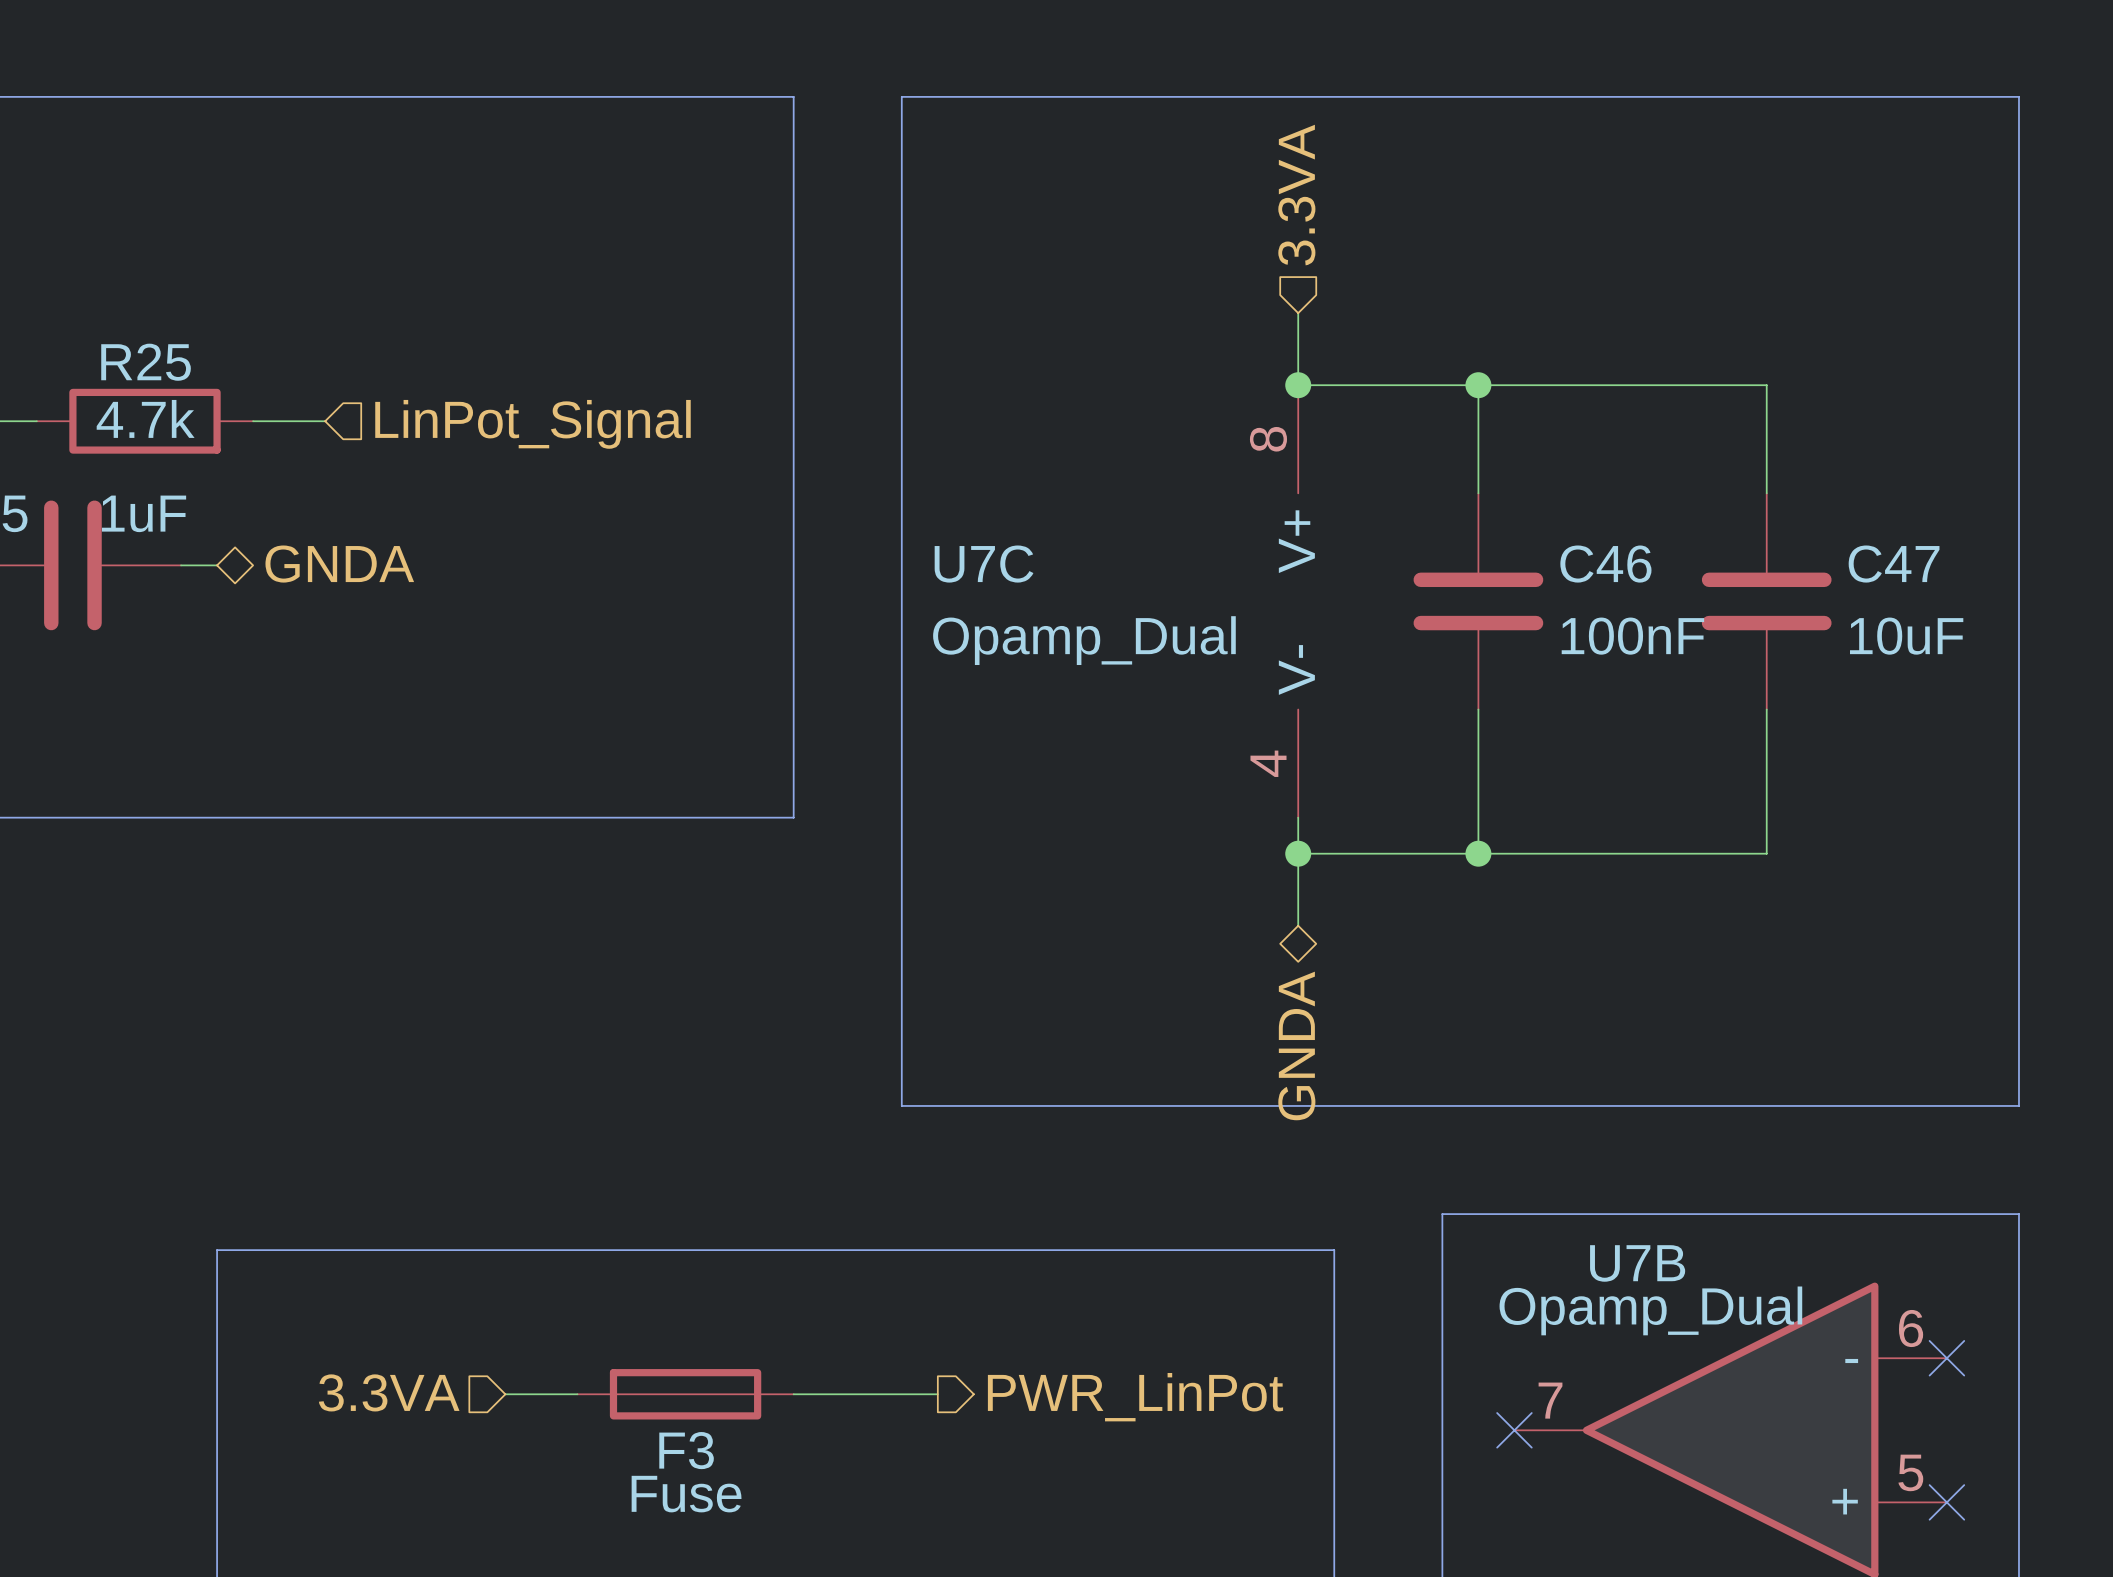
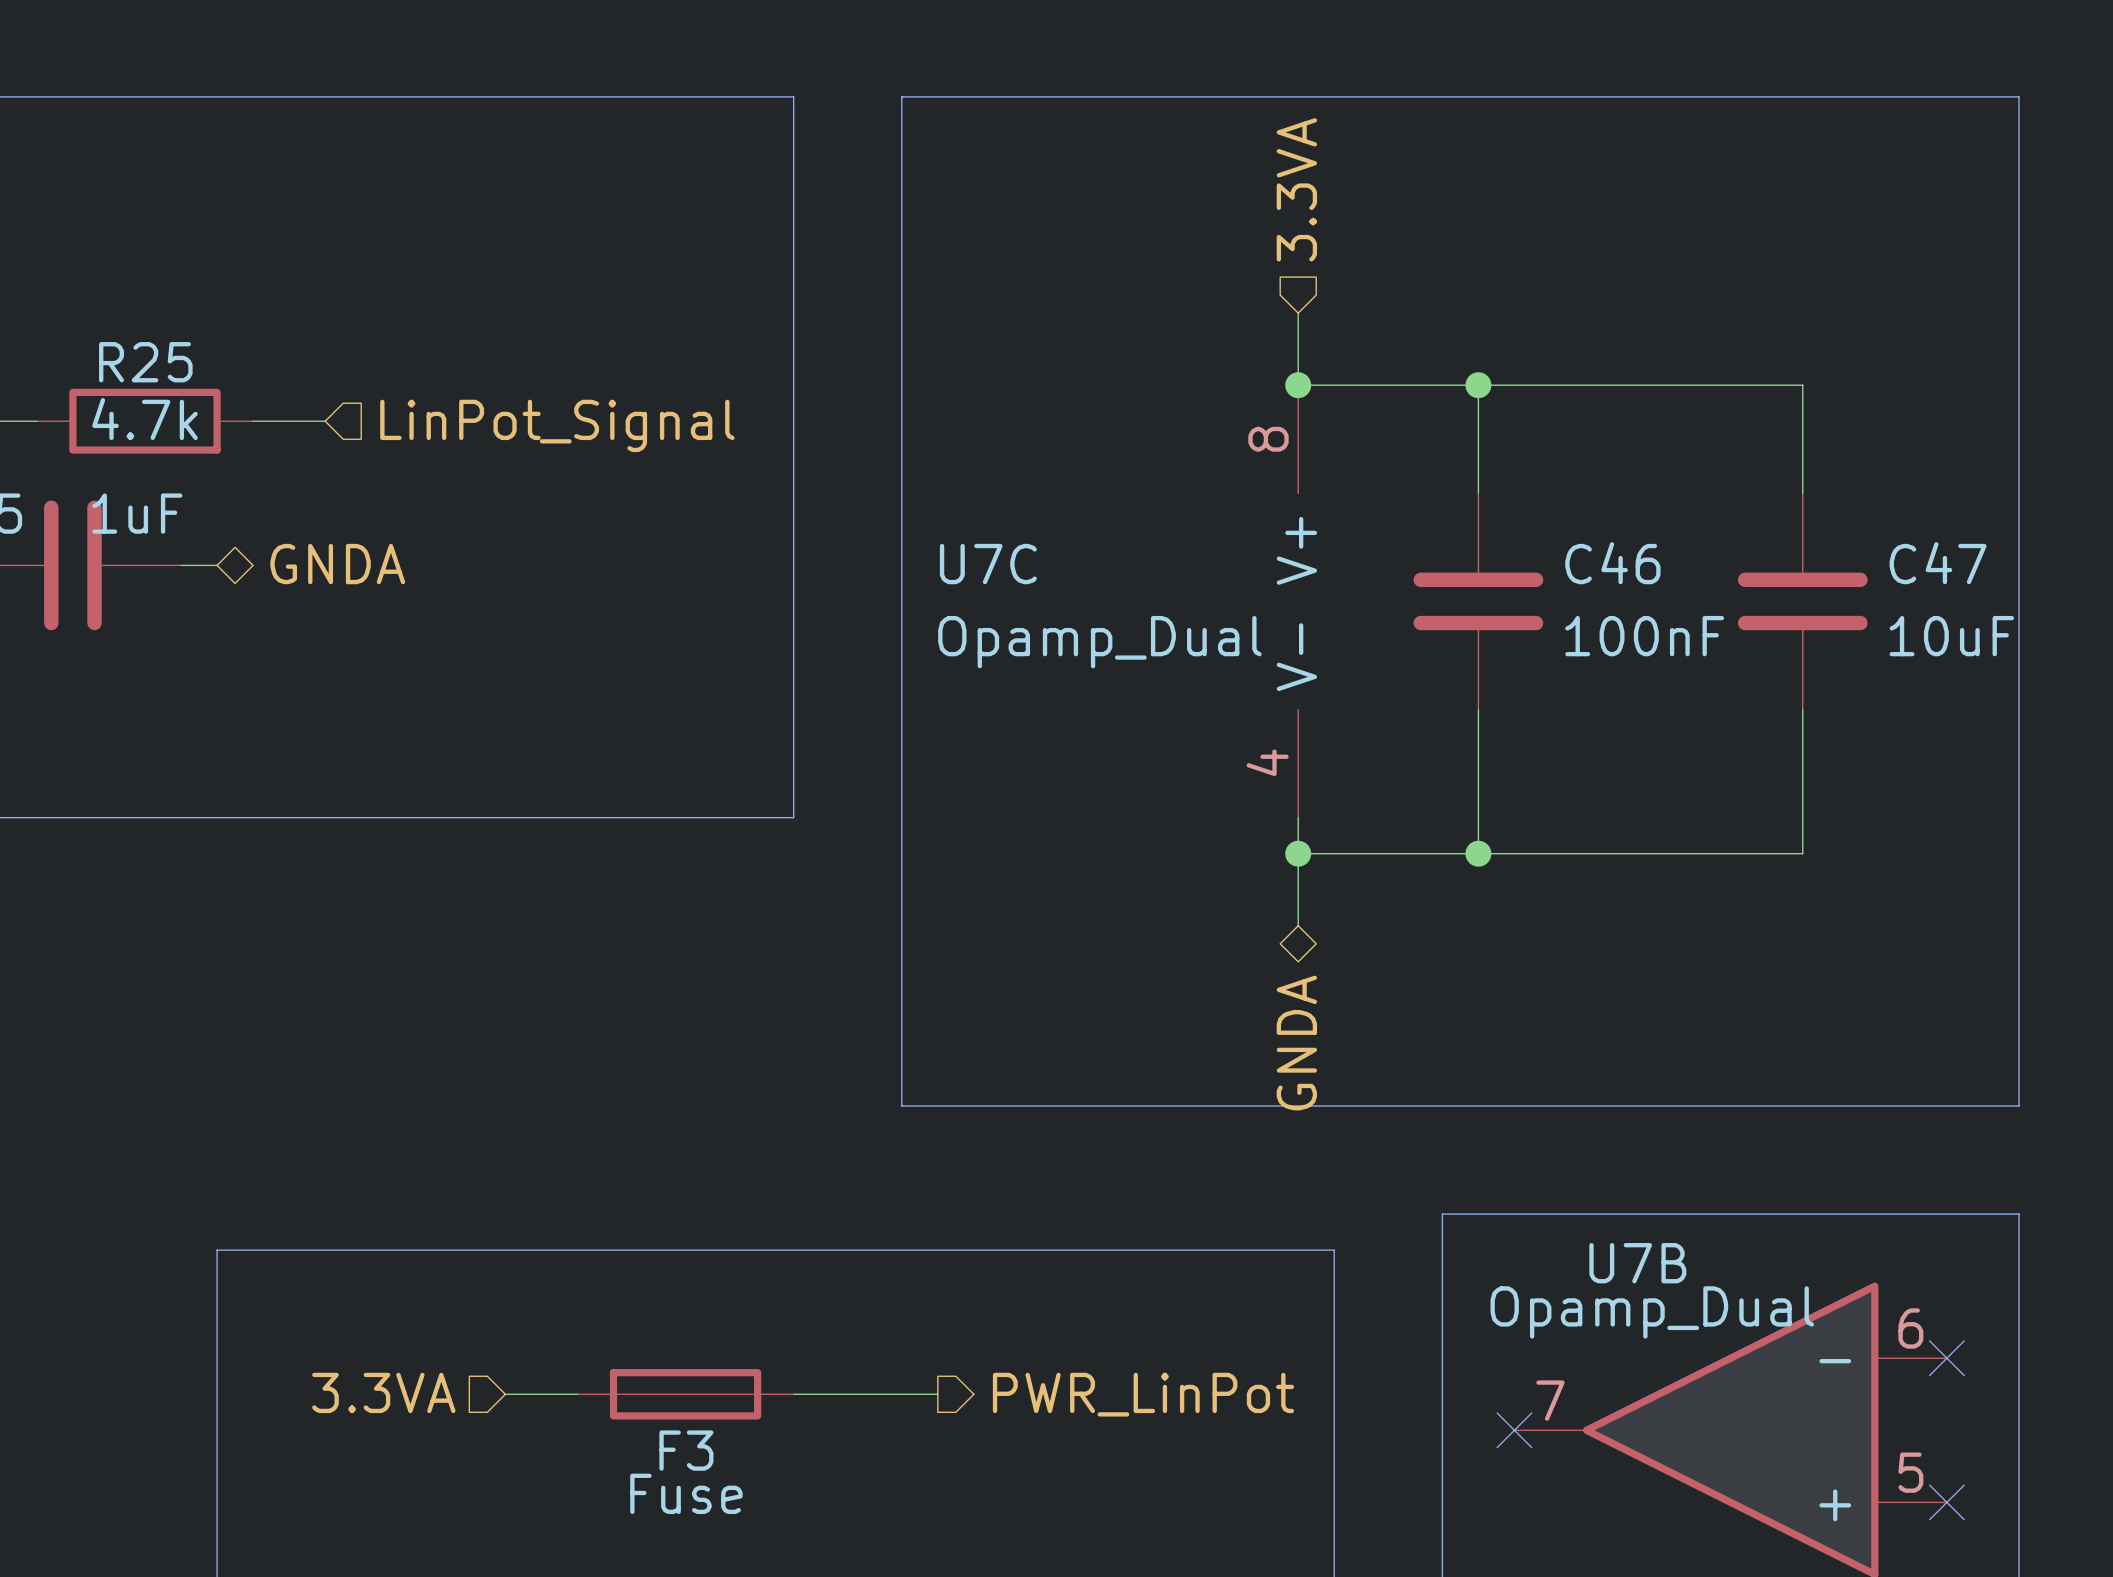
wire: (1766, 385) (1766, 493) -> (1766, 385) (1802, 385) (1802, 493)
C47 position: (1766, 601) -> (1802, 601)
wire: (1766, 709) (1766, 853) -> (1802, 709) (1802, 853) (1766, 853)

